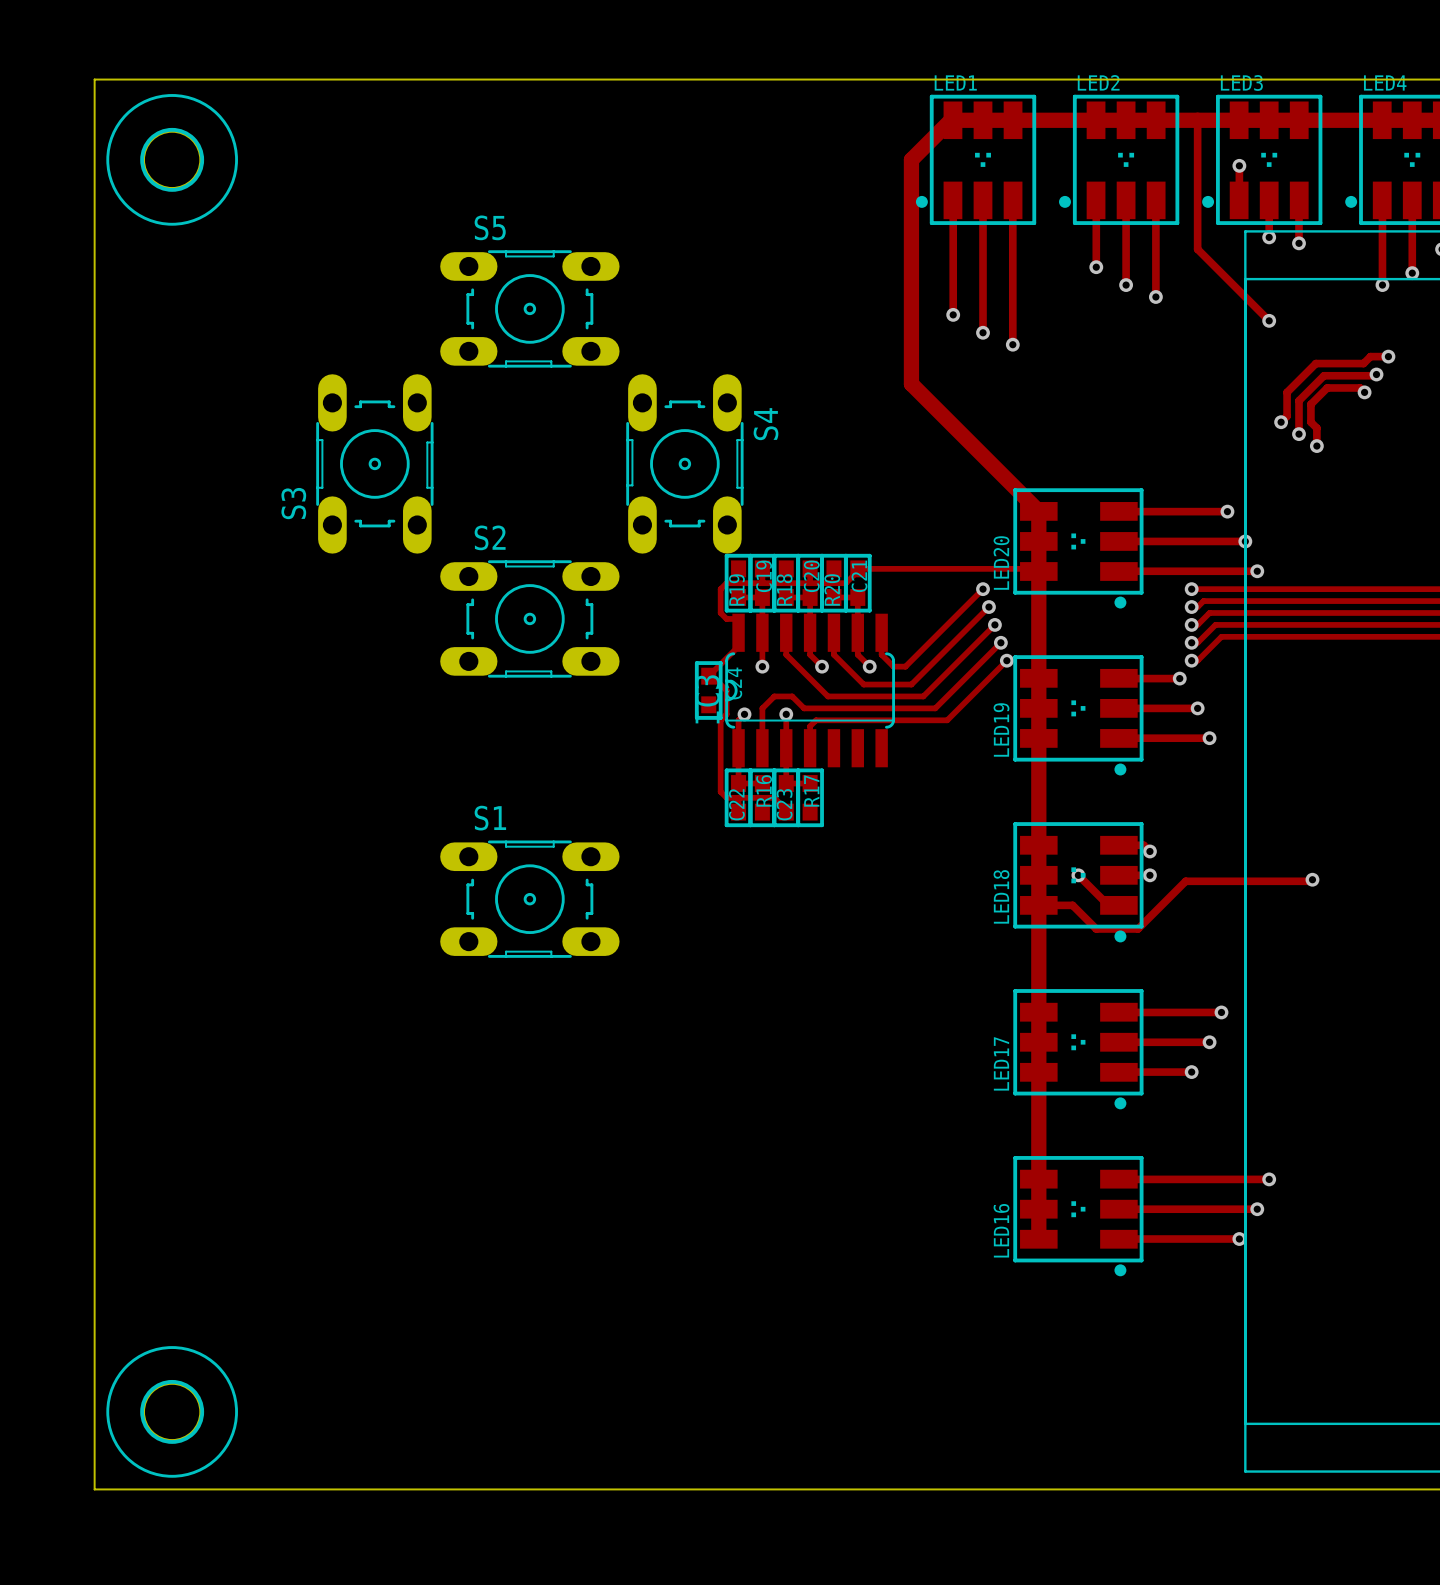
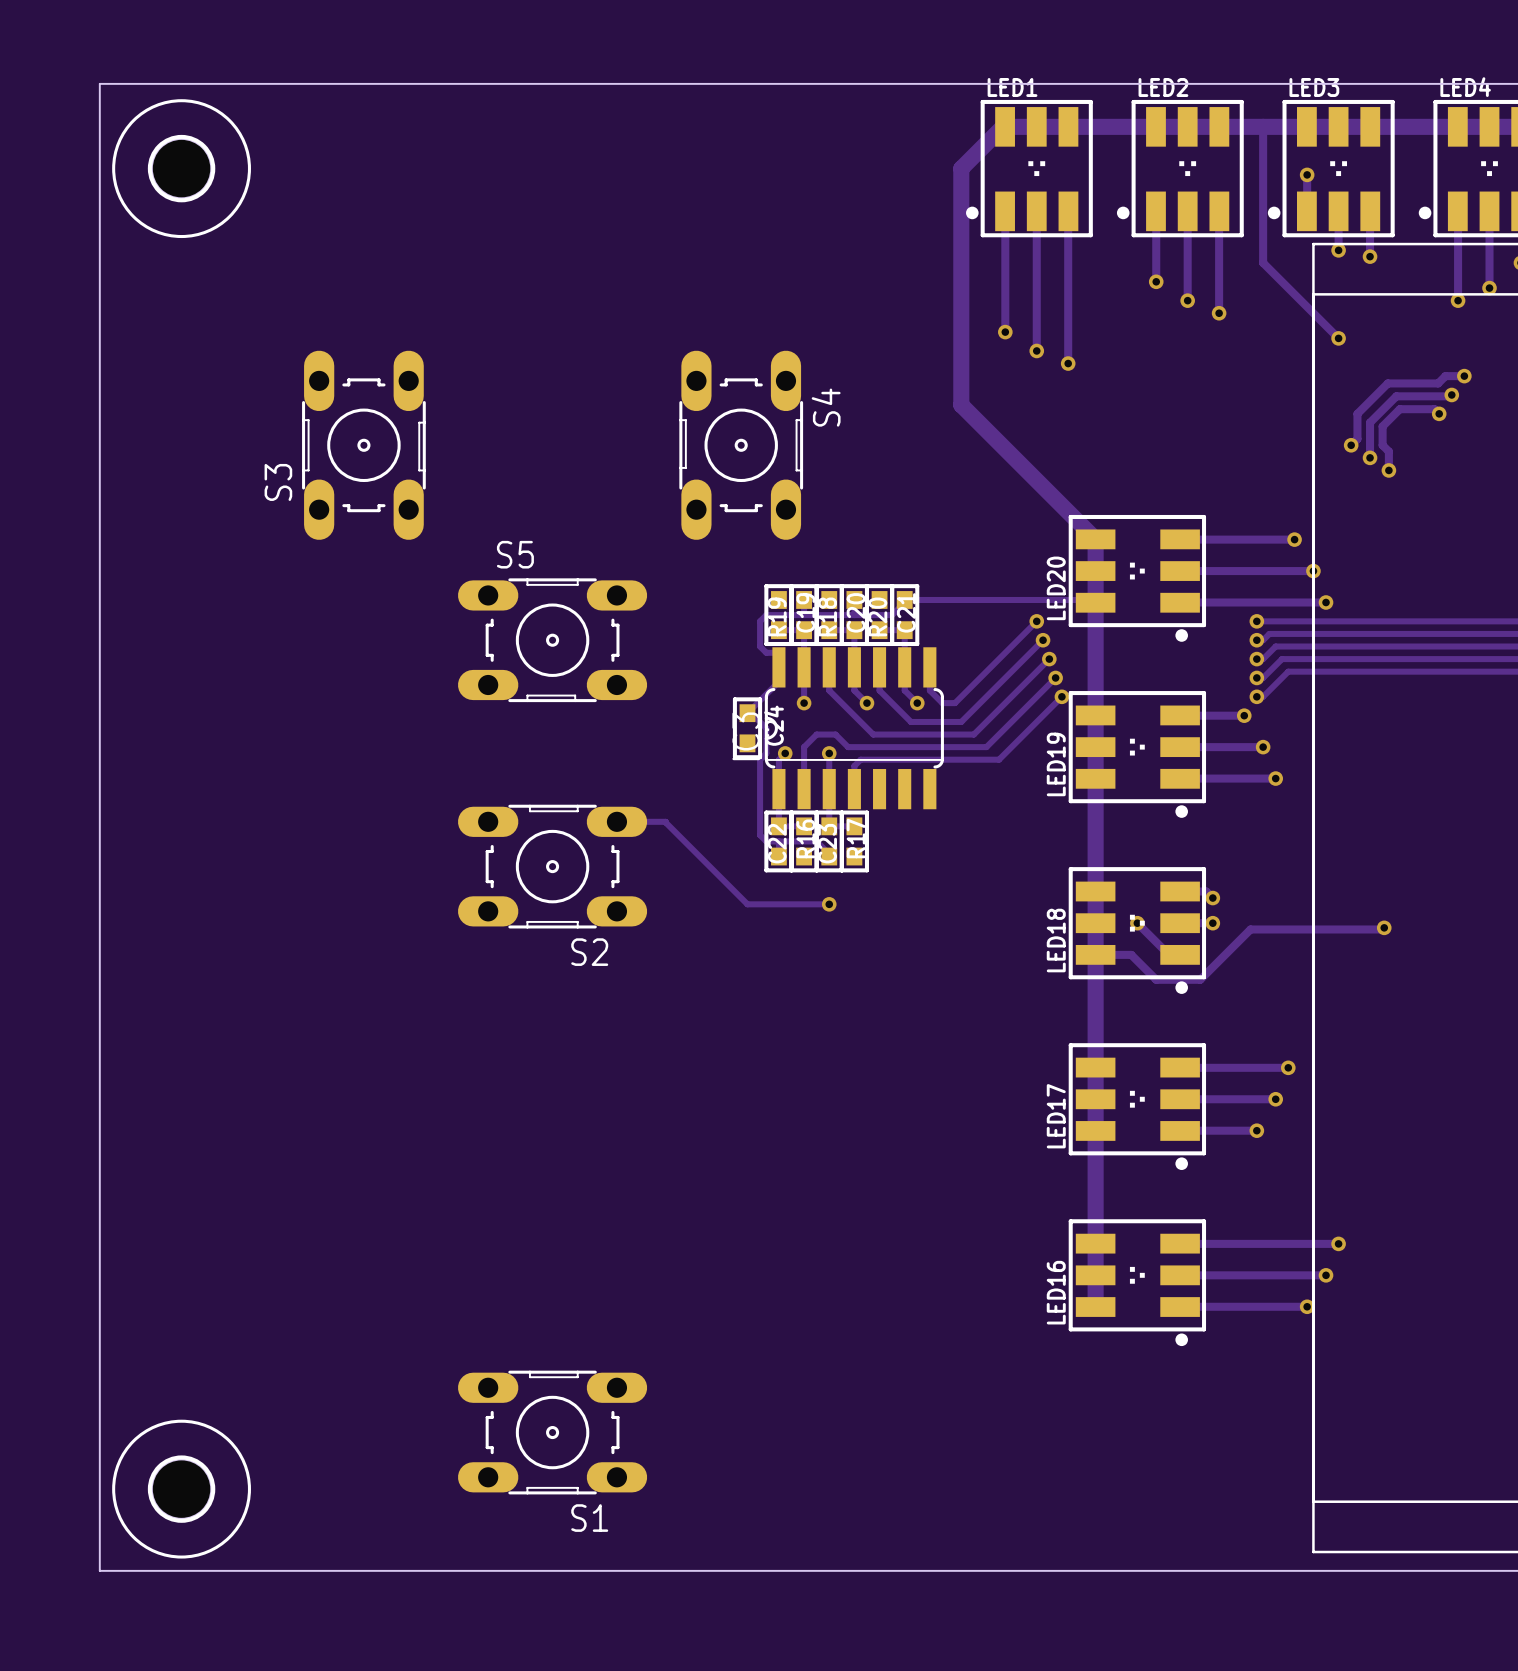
S5 position: (529, 308) -> (552, 640)
S3 position: (374, 463) -> (363, 445)
S4 position: (684, 463) -> (741, 445)
S2 rotation: 0° (529, 618) -> 180° (552, 866)
S2 position: (529, 618) -> (552, 866)
track: none -> (616, 821) (665, 821) (747, 904) (829, 904)
via: none -> (829, 904)
S1 rotation: 0° (529, 899) -> 180° (552, 1432)
S1 position: (529, 899) -> (552, 1432)

